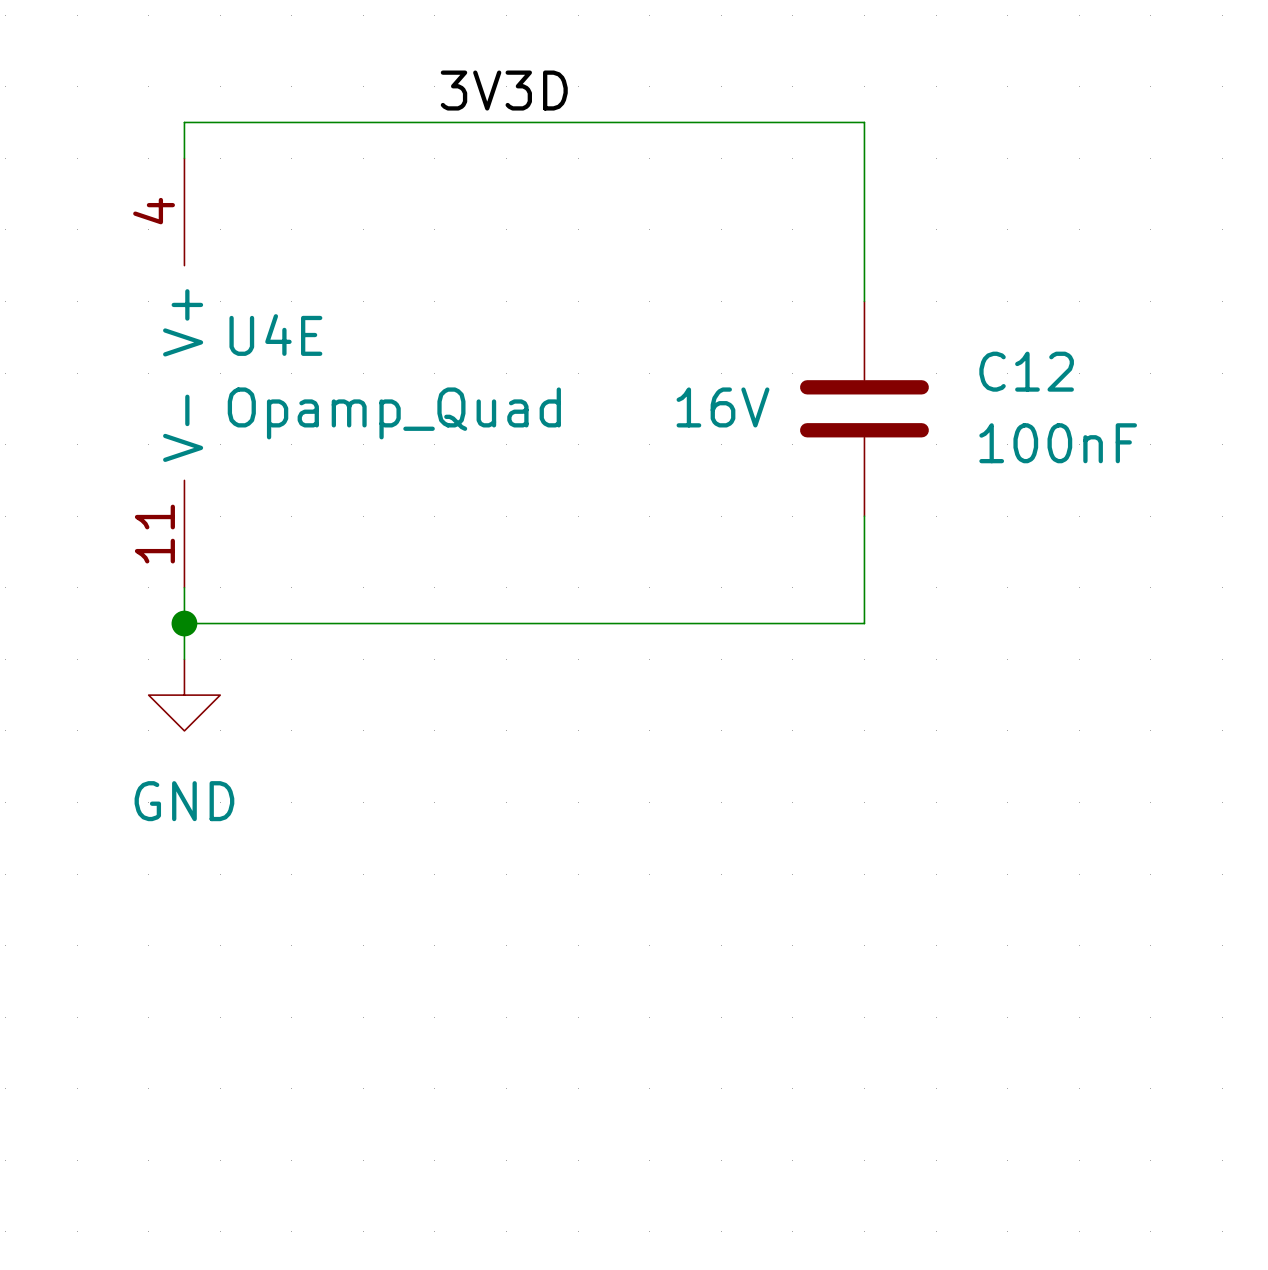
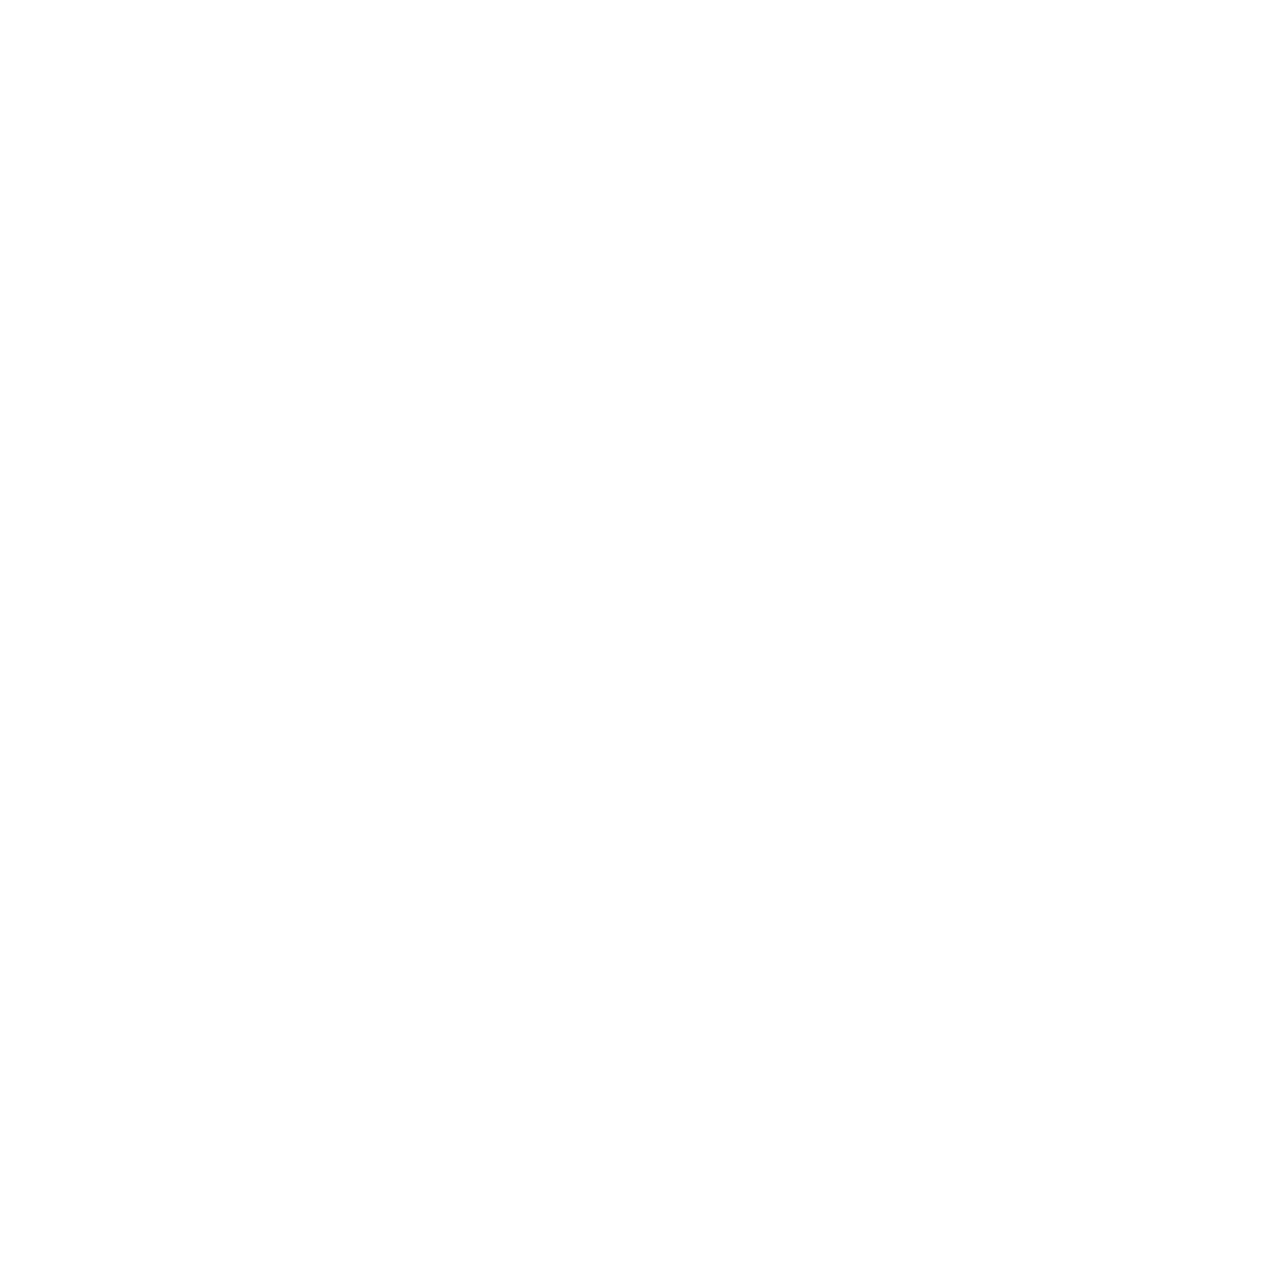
label: 3V3D (504, 90) -> none
wire: (184, 158) (184, 122) (864, 122) (864, 301) -> none
U4E: Opamp_Quad (184, 373) -> none
C12: 100nF (864, 408) -> none
wire: (864, 516) (864, 623) (184, 623) -> none
wire: (184, 587) (184, 659) -> none
junction: (184, 623) -> none
power symbol: GND (184, 695) -> none

